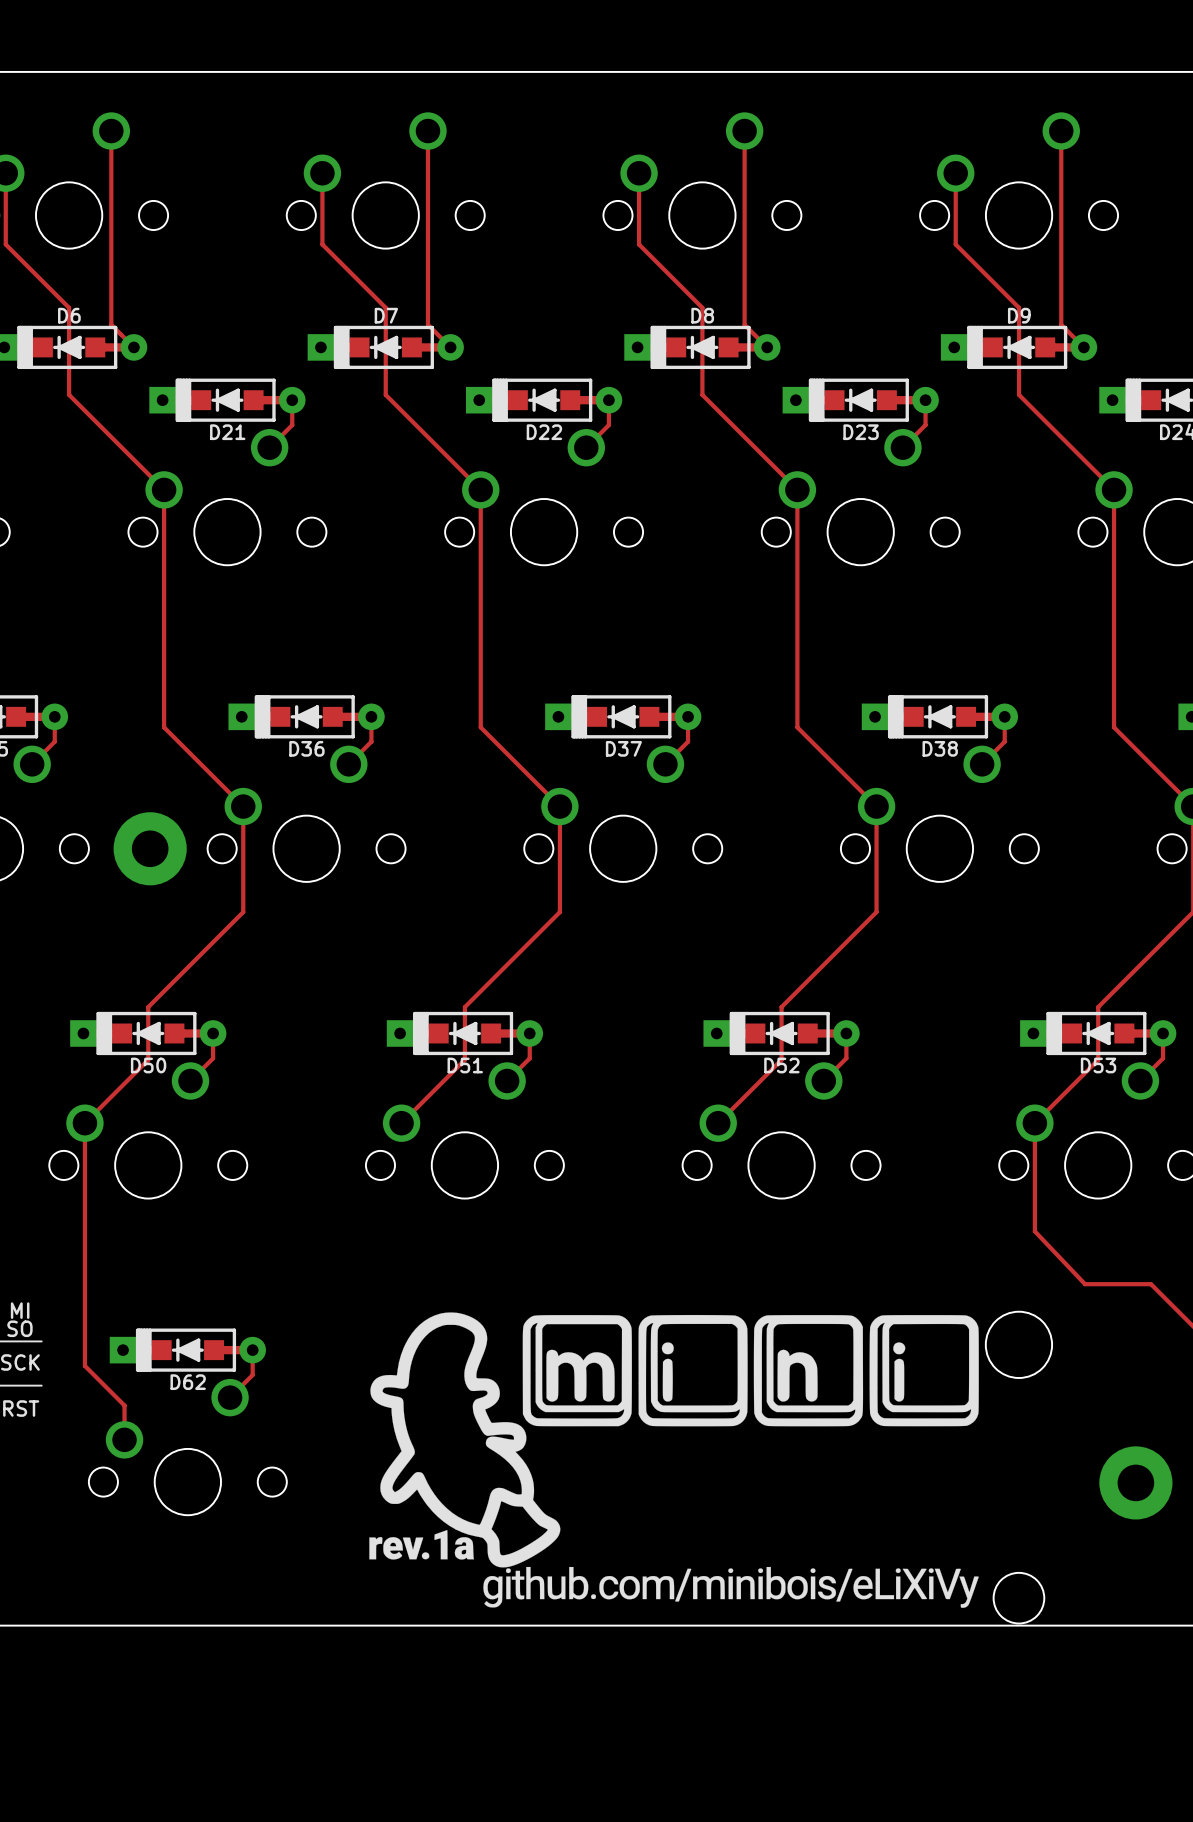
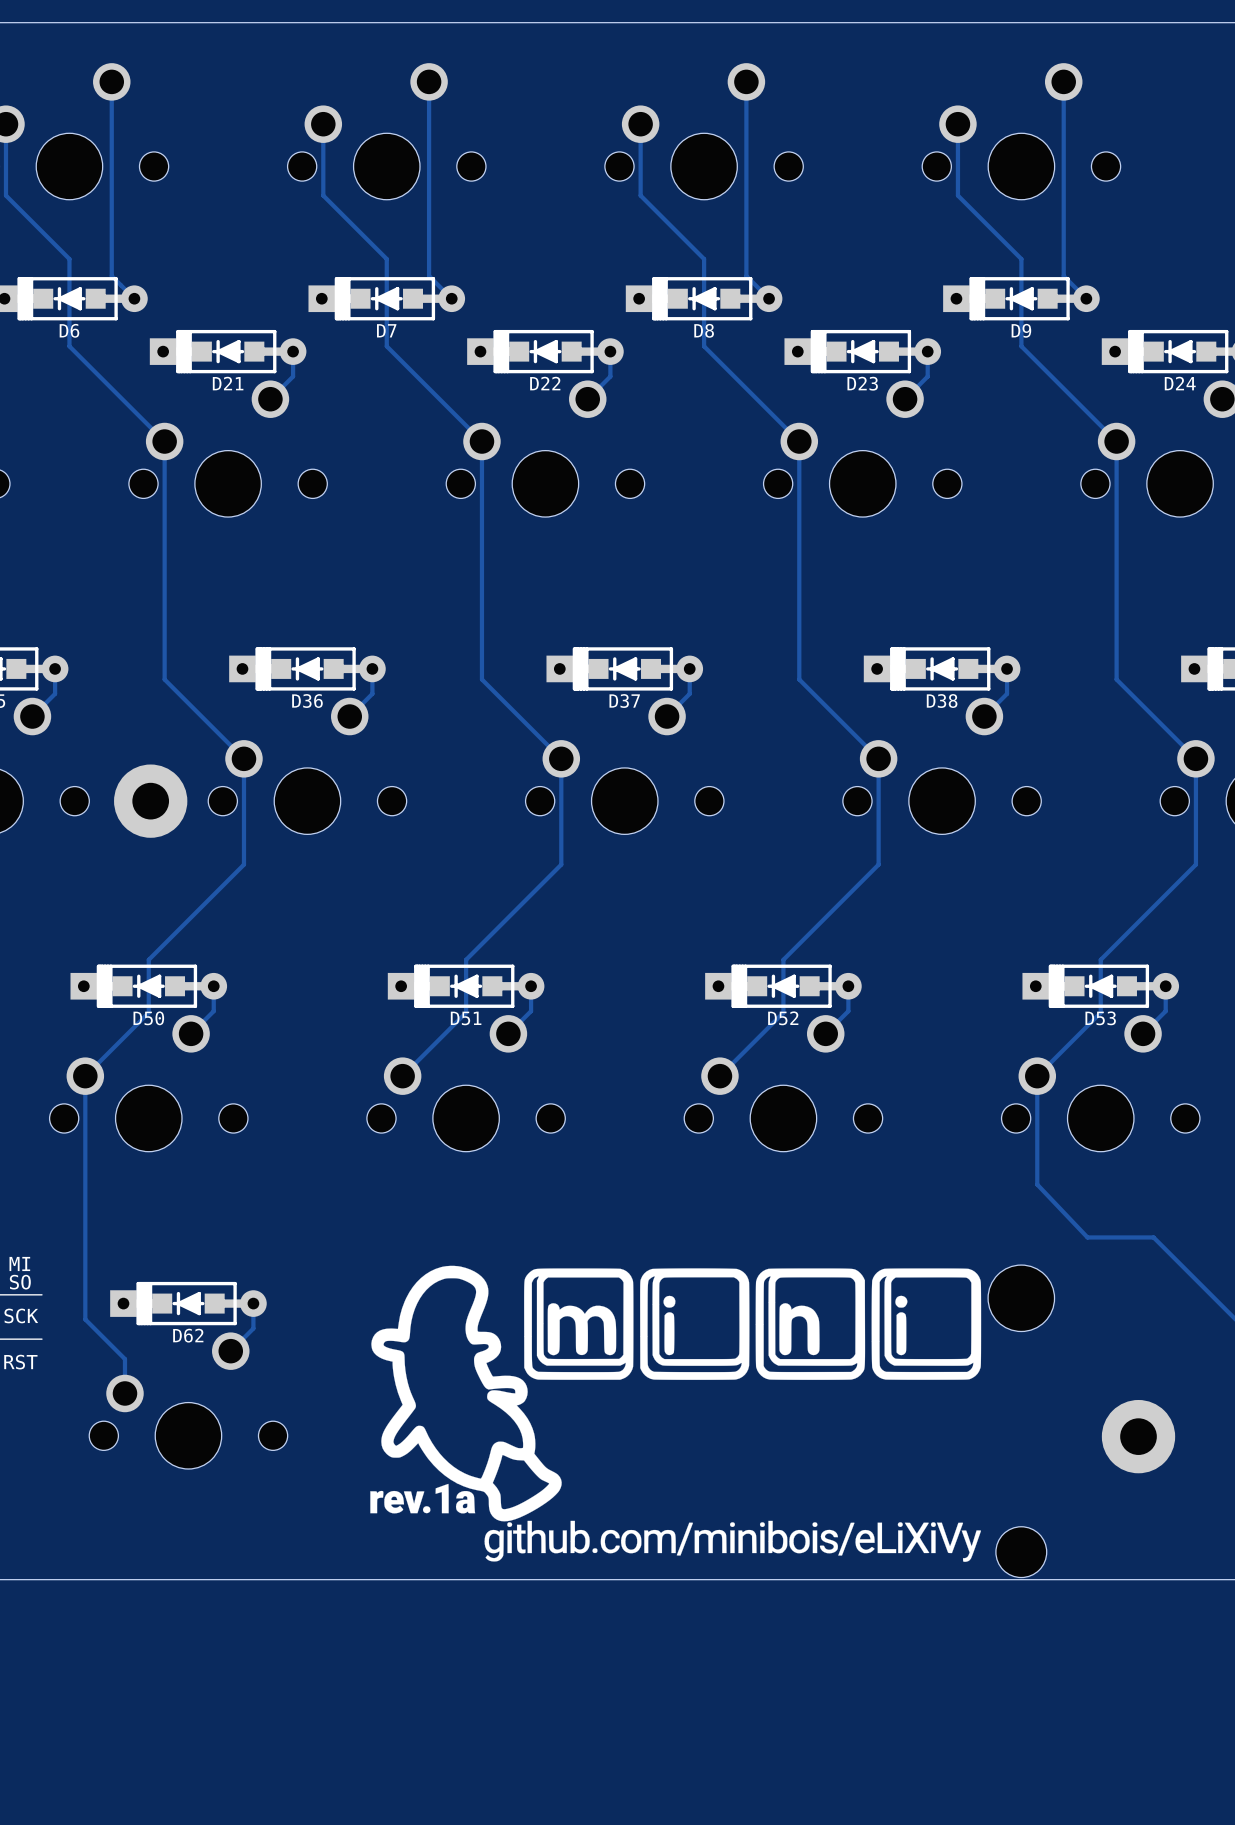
D6 name position: D6 (69, 315) -> D6 (69, 330)
D7 name position: D7 (386, 315) -> D7 (386, 330)
D8 name position: D8 (702, 315) -> D8 (704, 330)
D9 name position: D9 (1019, 315) -> D9 (1021, 330)

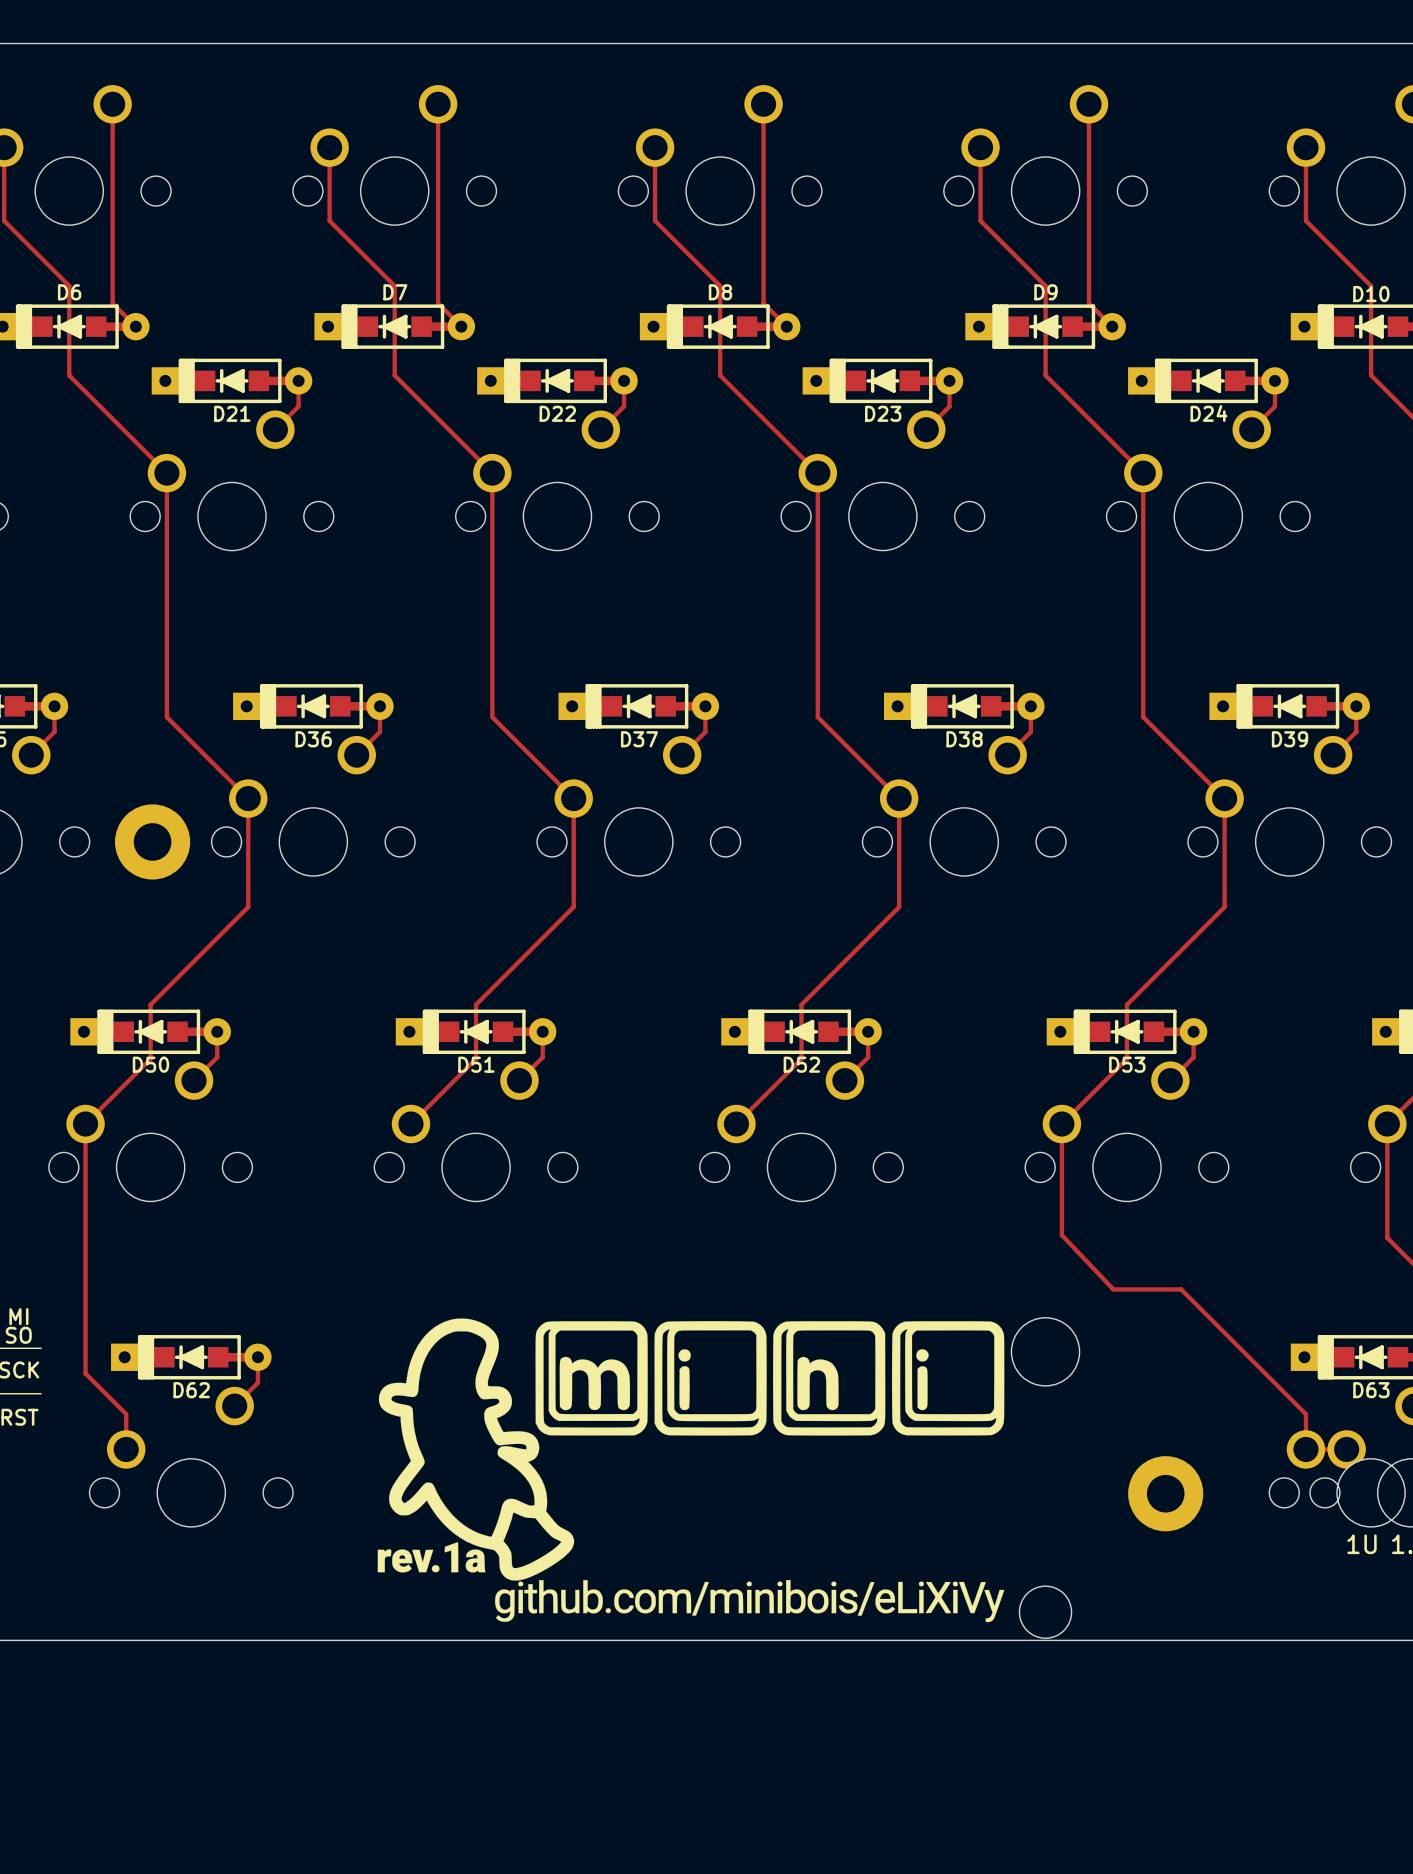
D6 name position: D6 (69, 330) -> D6 (69, 292)
D7 name position: D7 (386, 330) -> D7 (395, 292)
D8 name position: D8 (704, 330) -> D8 (720, 292)
D9 name position: D9 (1021, 330) -> D9 (1045, 292)

